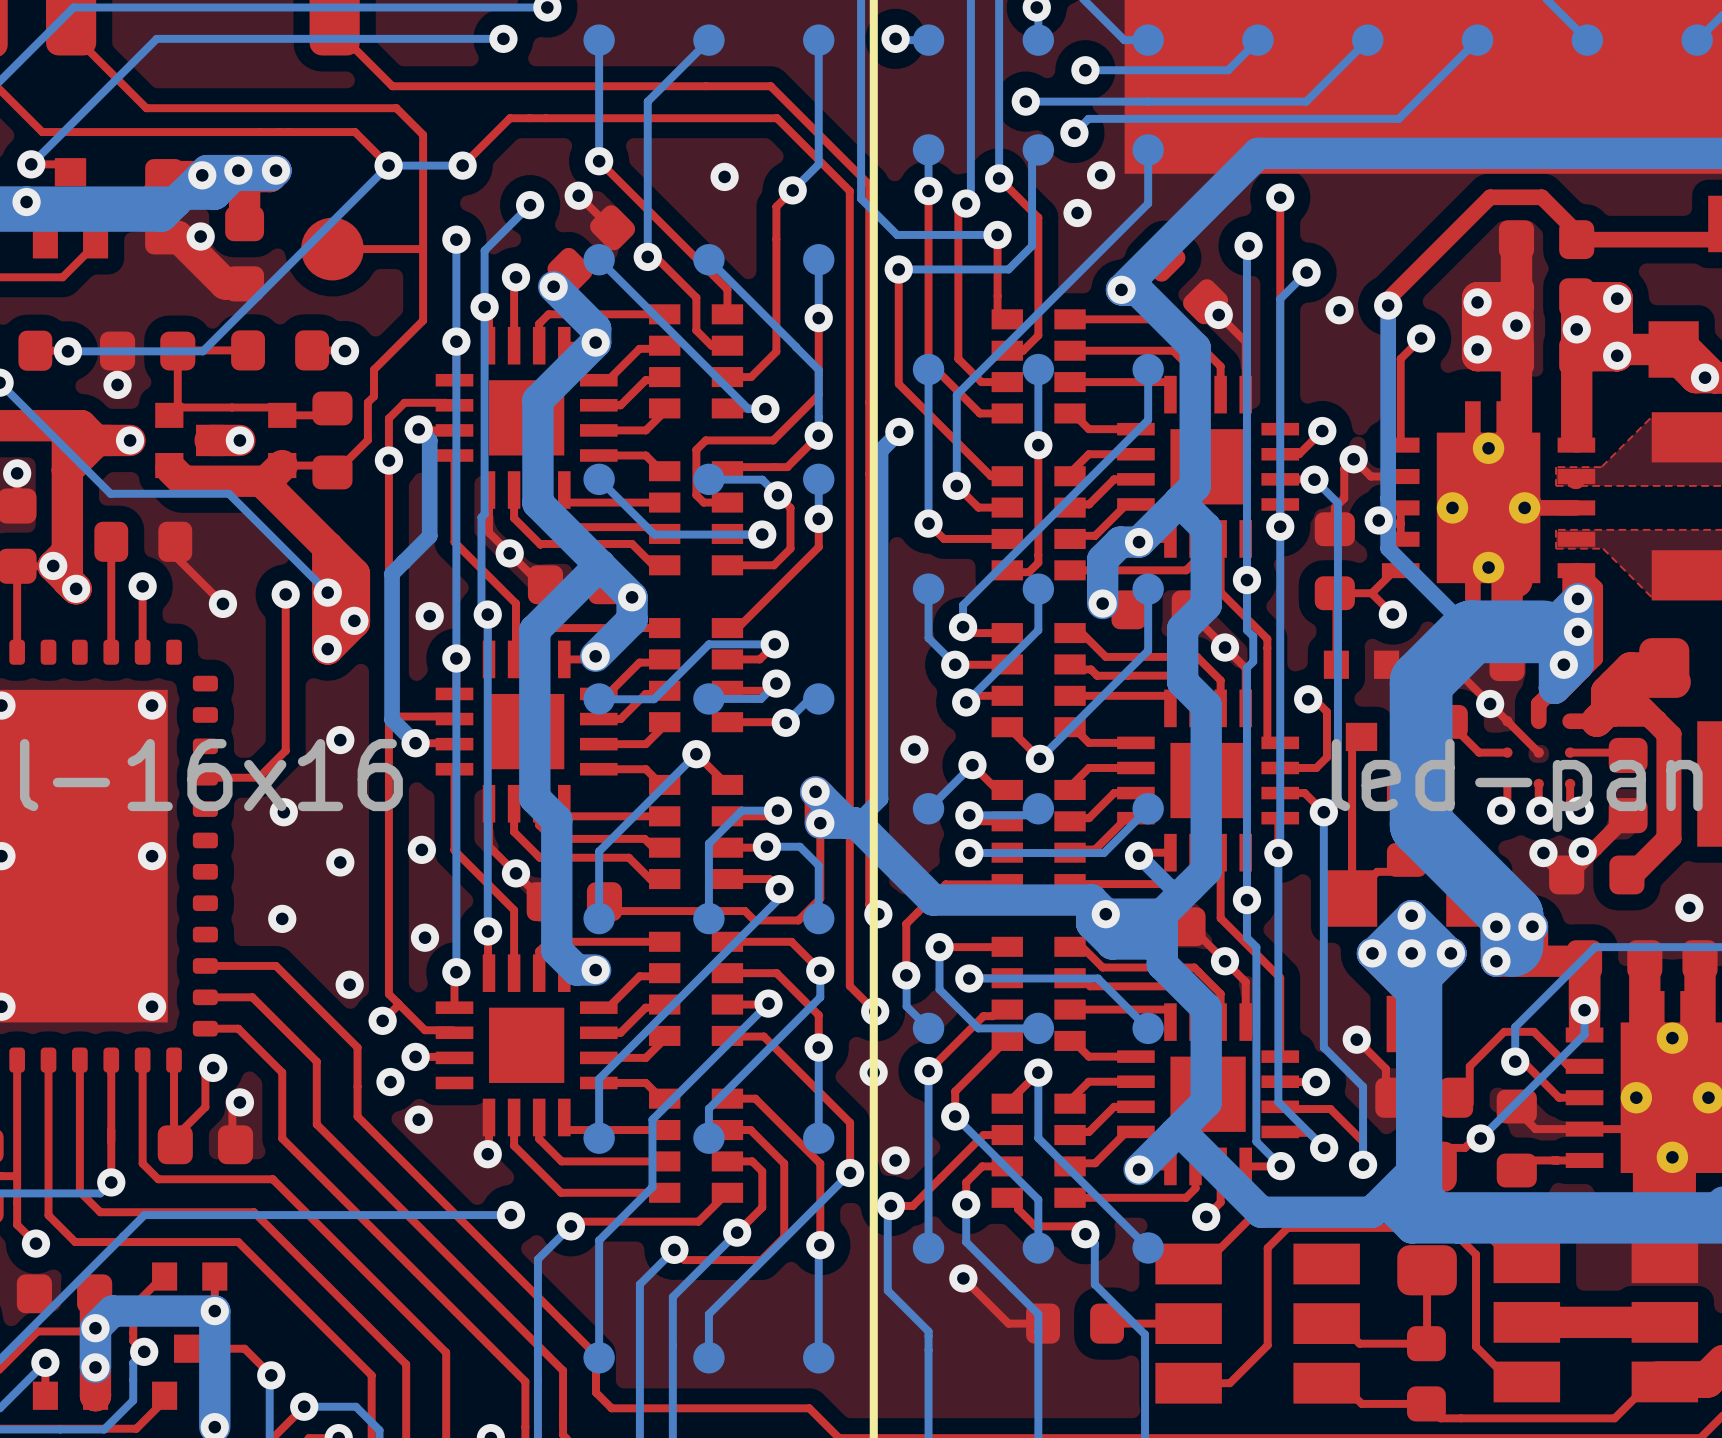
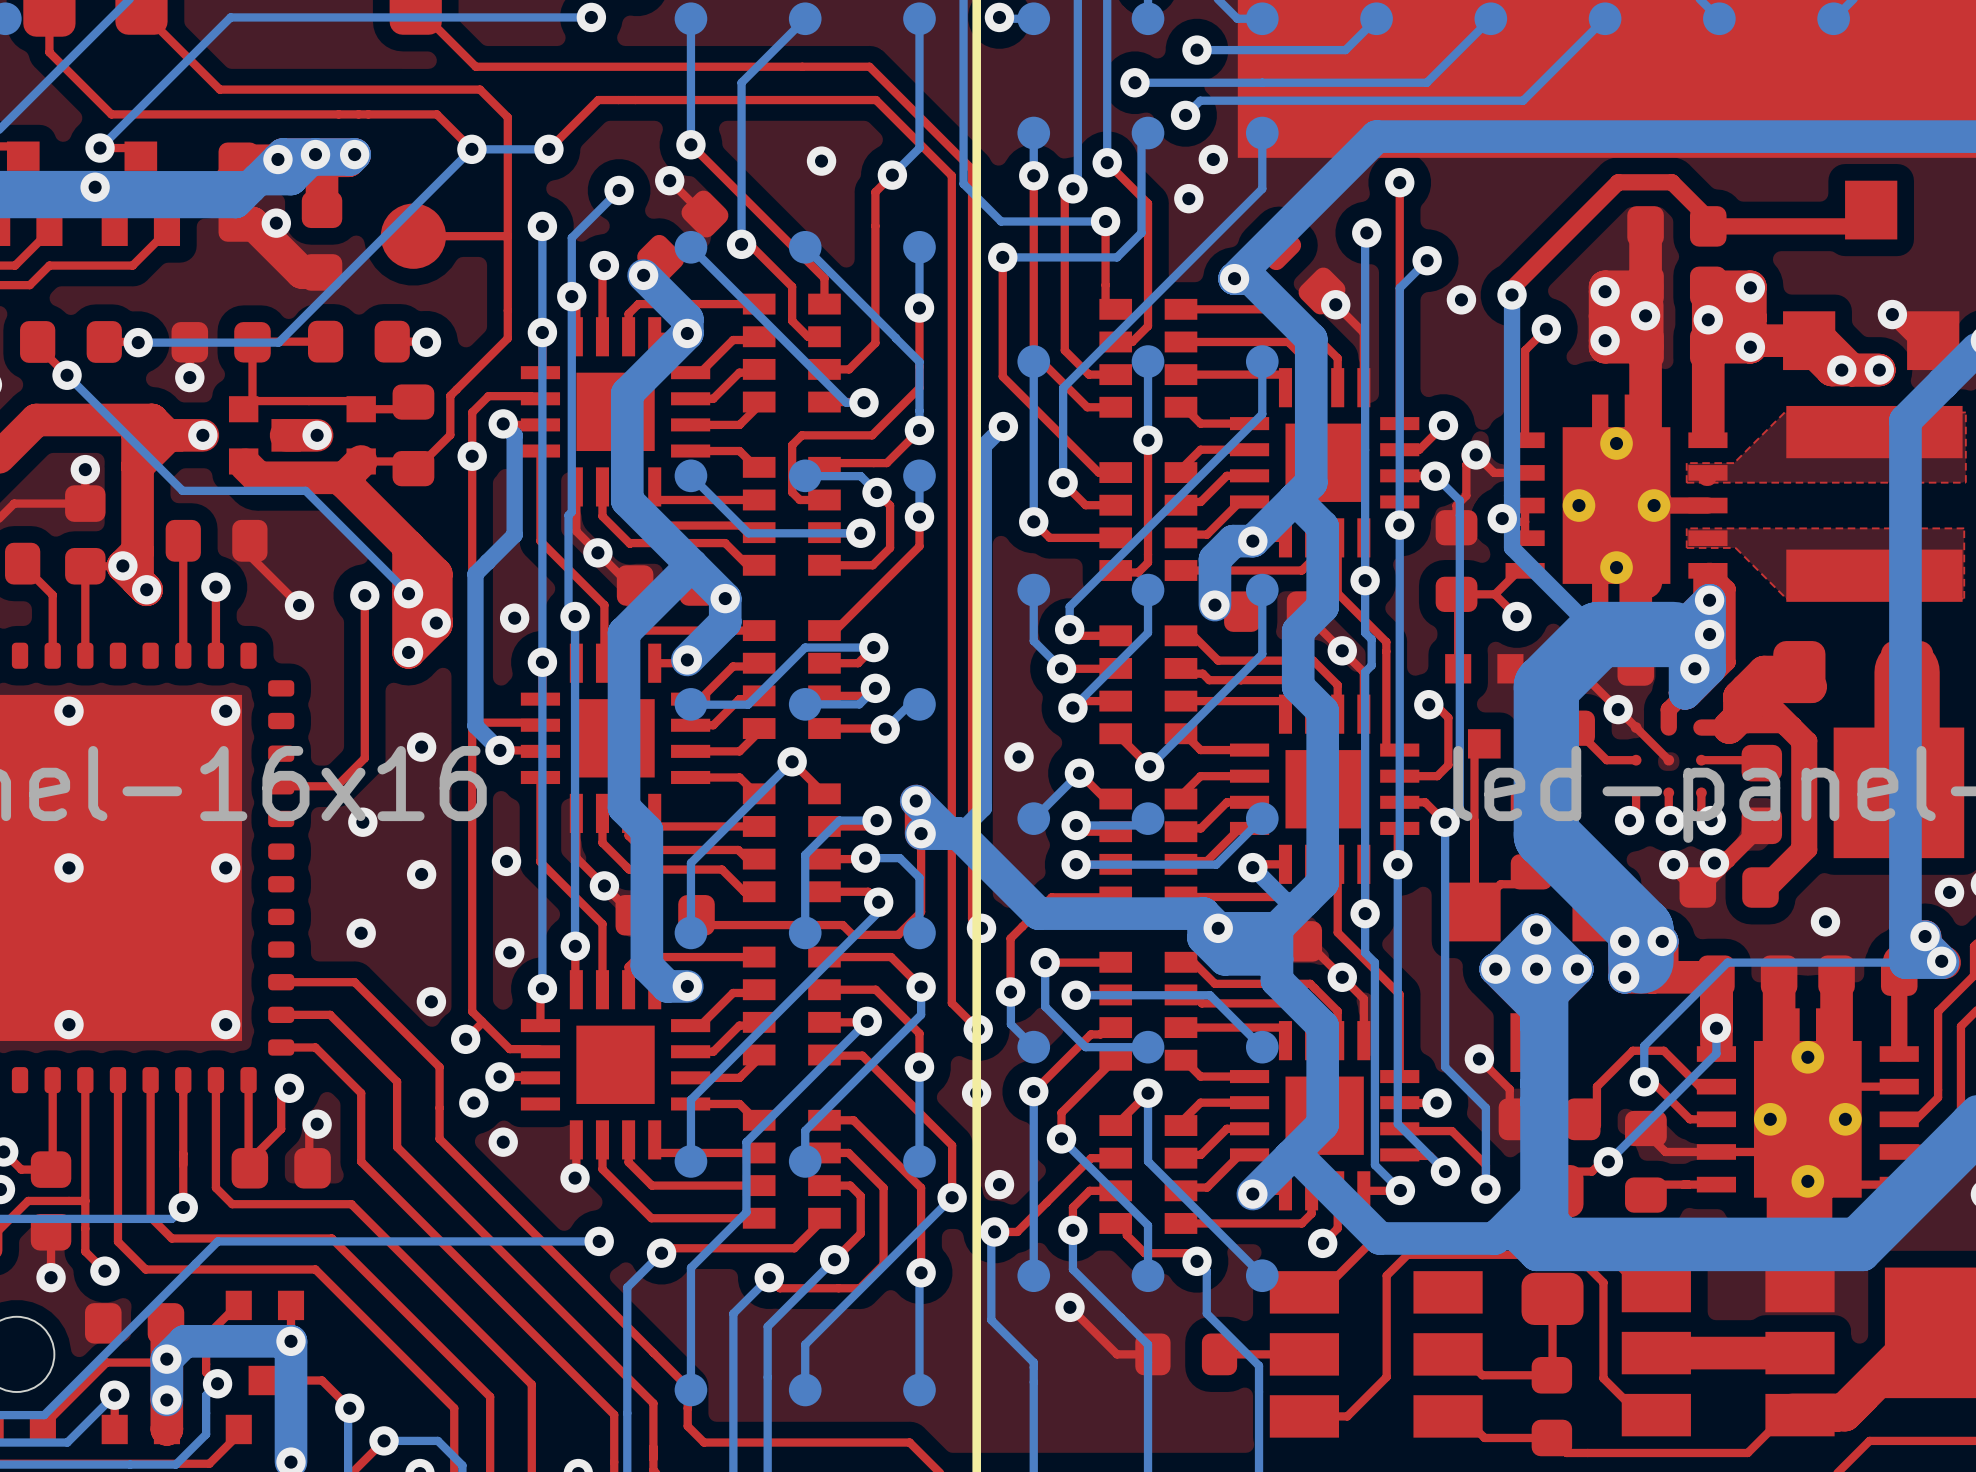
top track: (423, 320) (374, 369) (374, 396) -> (507, 310) (507, 338) (456, 389)

